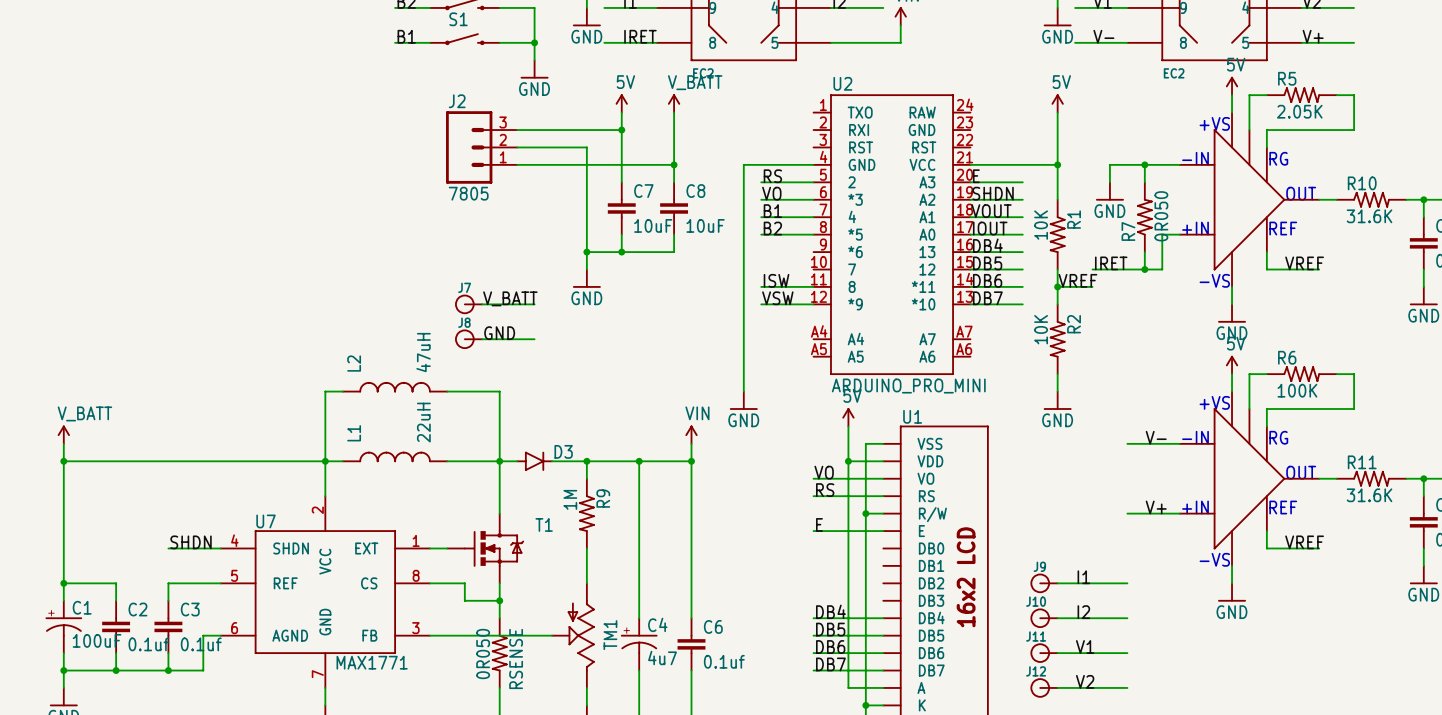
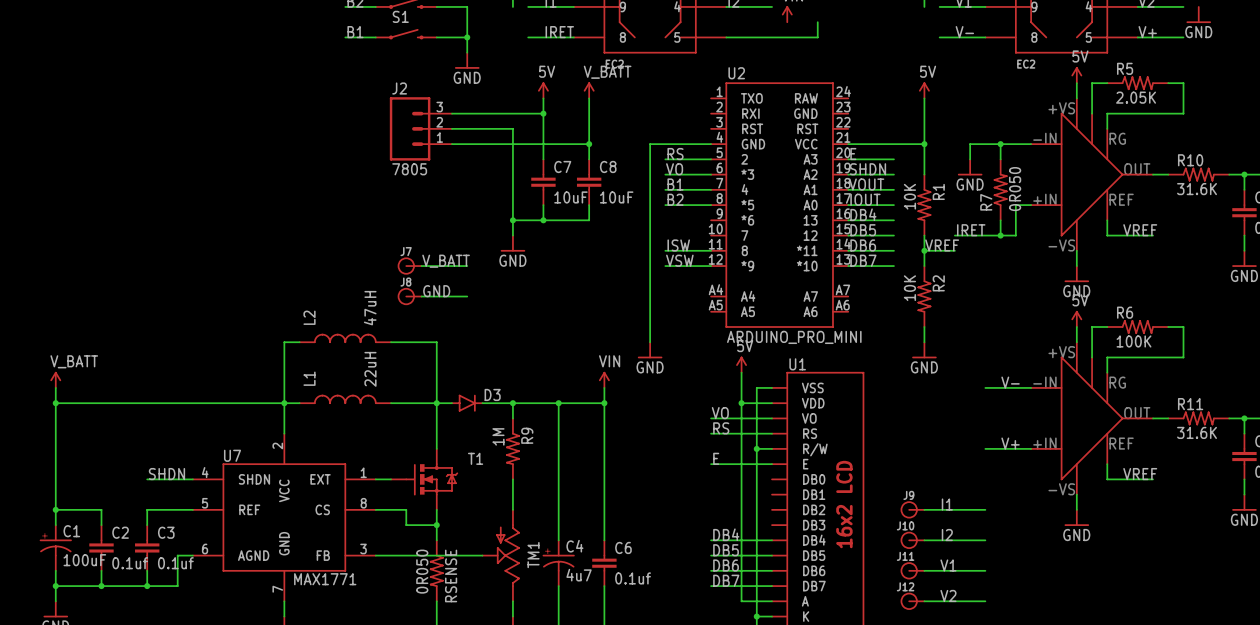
power symbol: GND (586, 17) -> none
power symbol: GND (1057, 17) -> none
power symbol: none -> GND (1198, 14)
wire: (900, 25) (900, 42) -> (817, 22) (817, 37) (787, 37)

